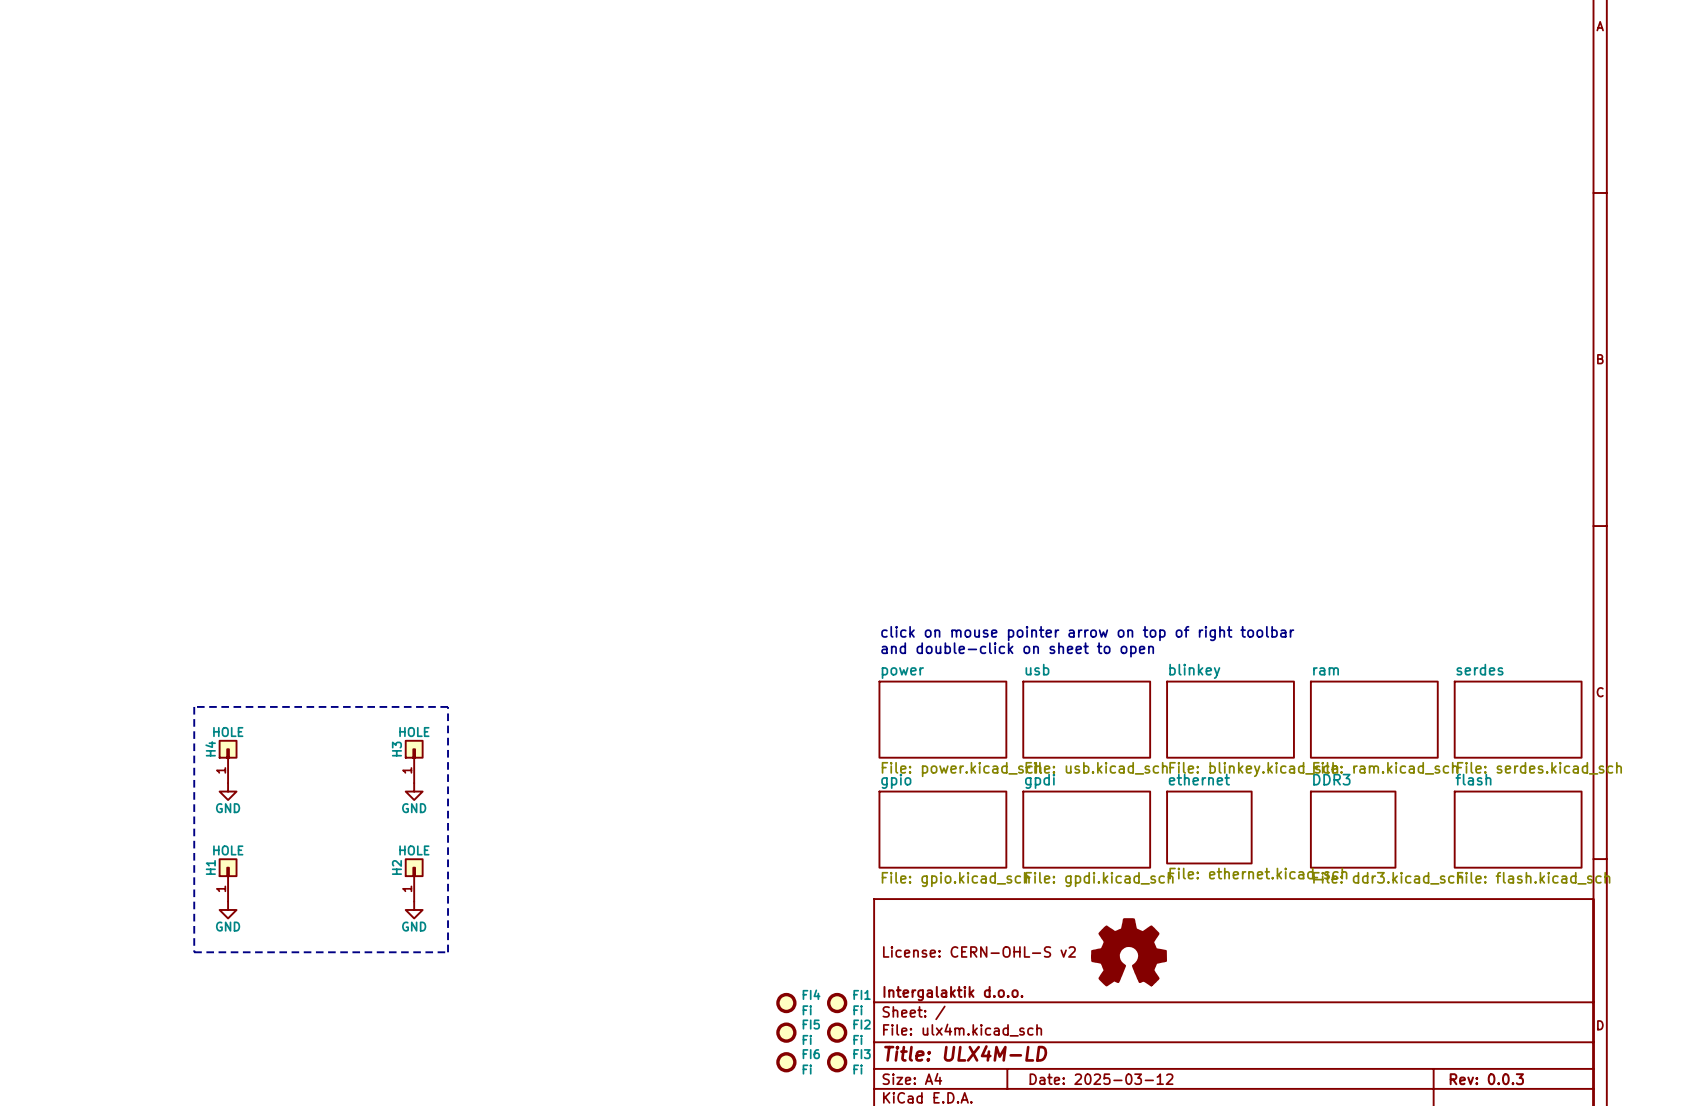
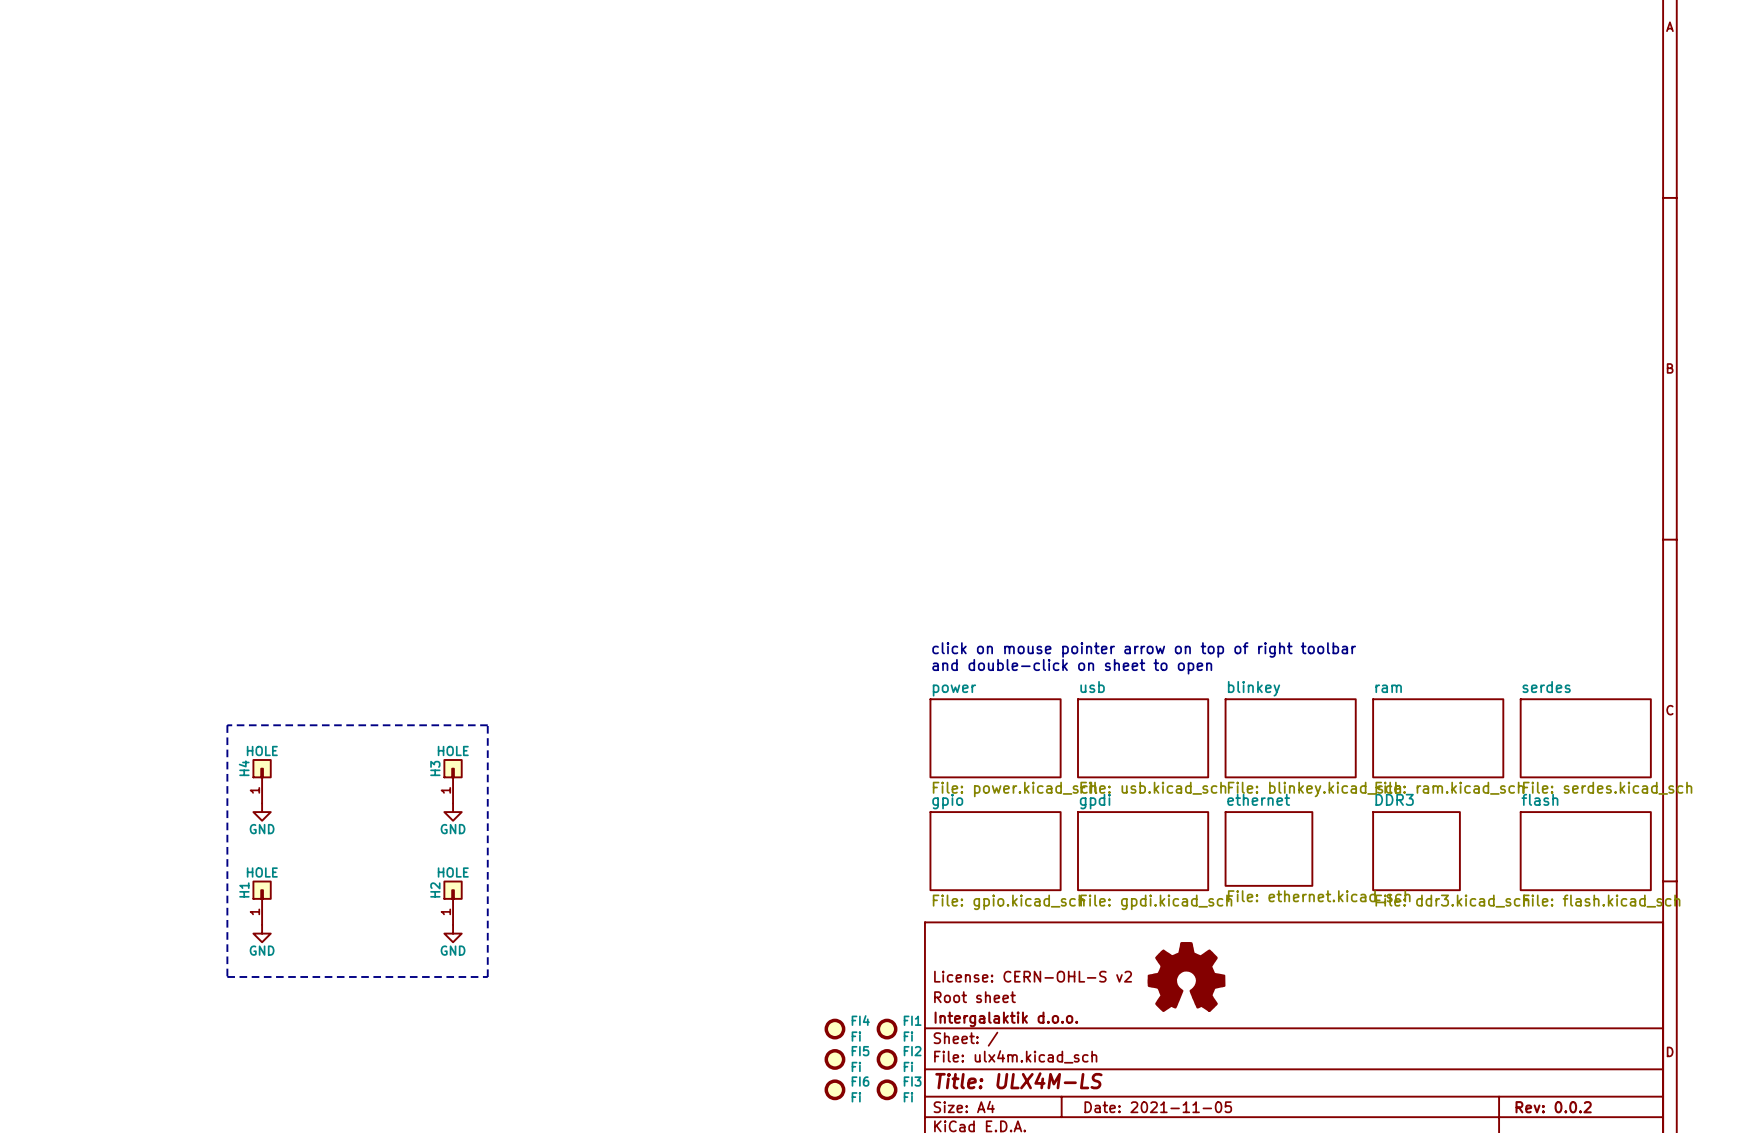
title block: none -> Root sheet (974, 997)
title block: Title: ULX4M-LD (965, 1053) -> Title: ULX4M-LS (1018, 1080)
title block: Date: 2025-03-12 (1101, 1079) -> Date: 2021-11-05 (1158, 1107)
title block: Rev: 0.0.3 (1486, 1079) -> Rev: 0.0.2 (1553, 1107)

